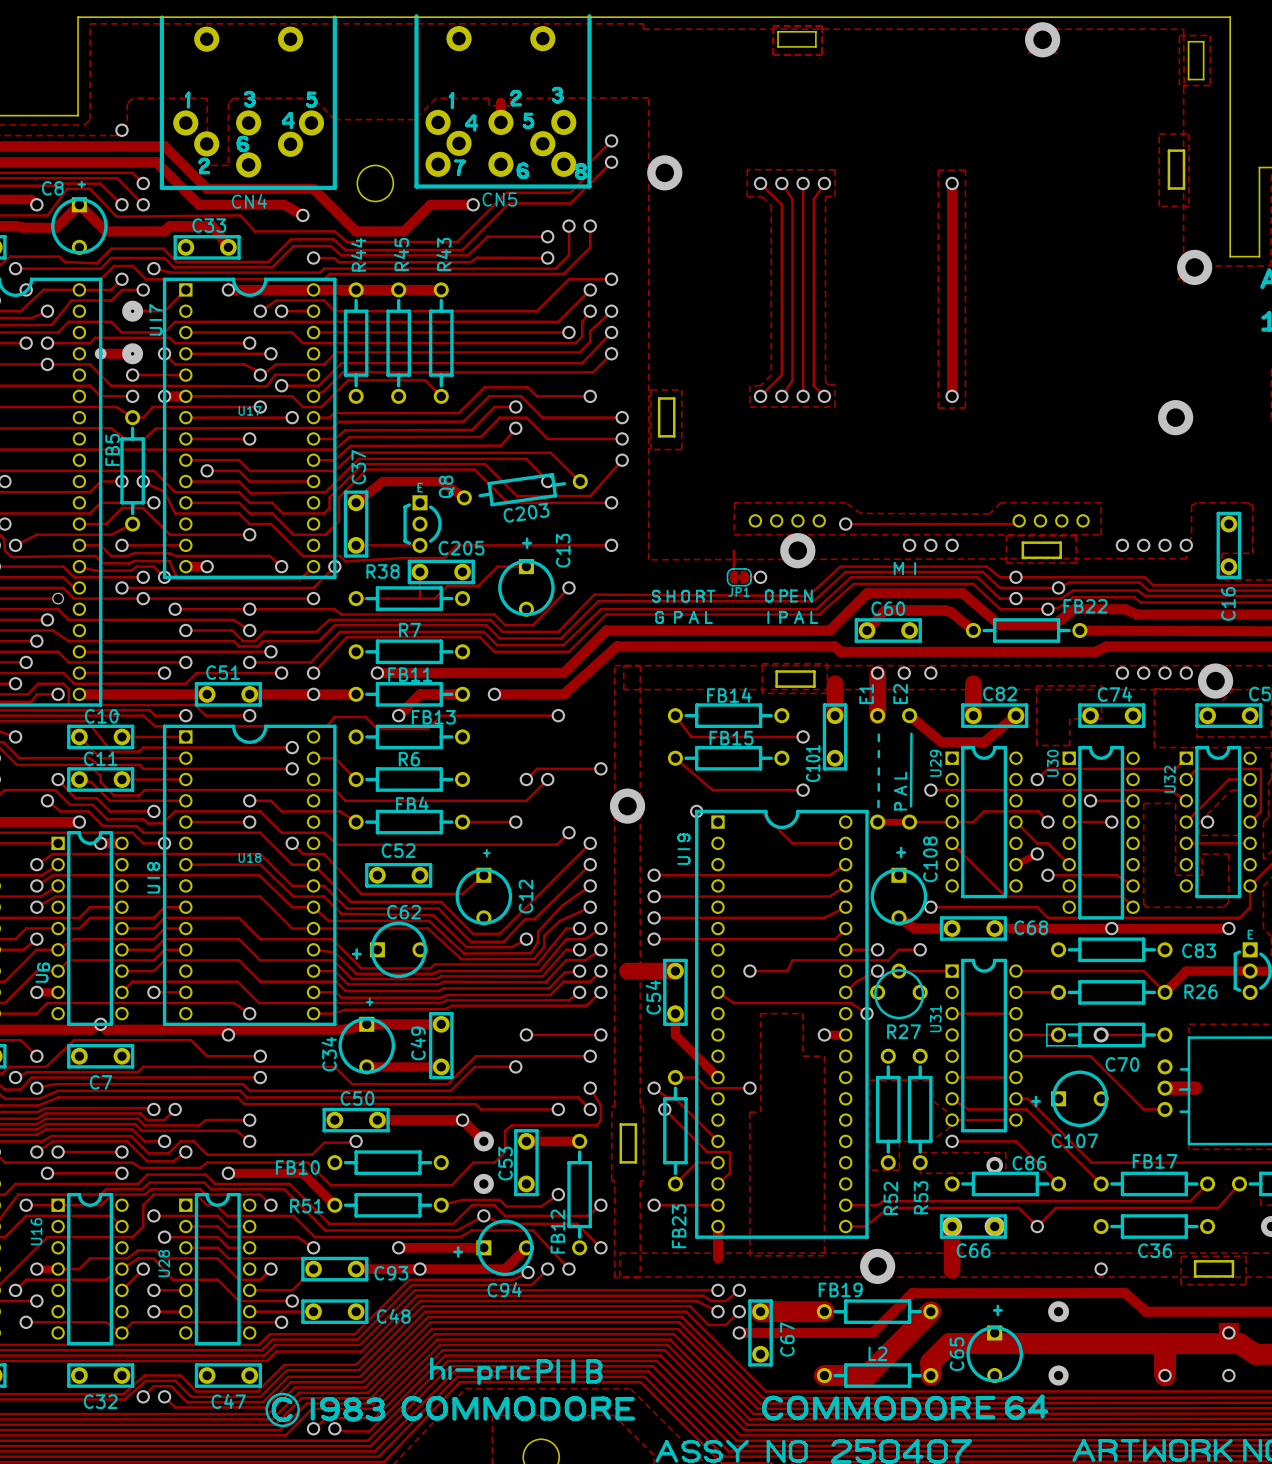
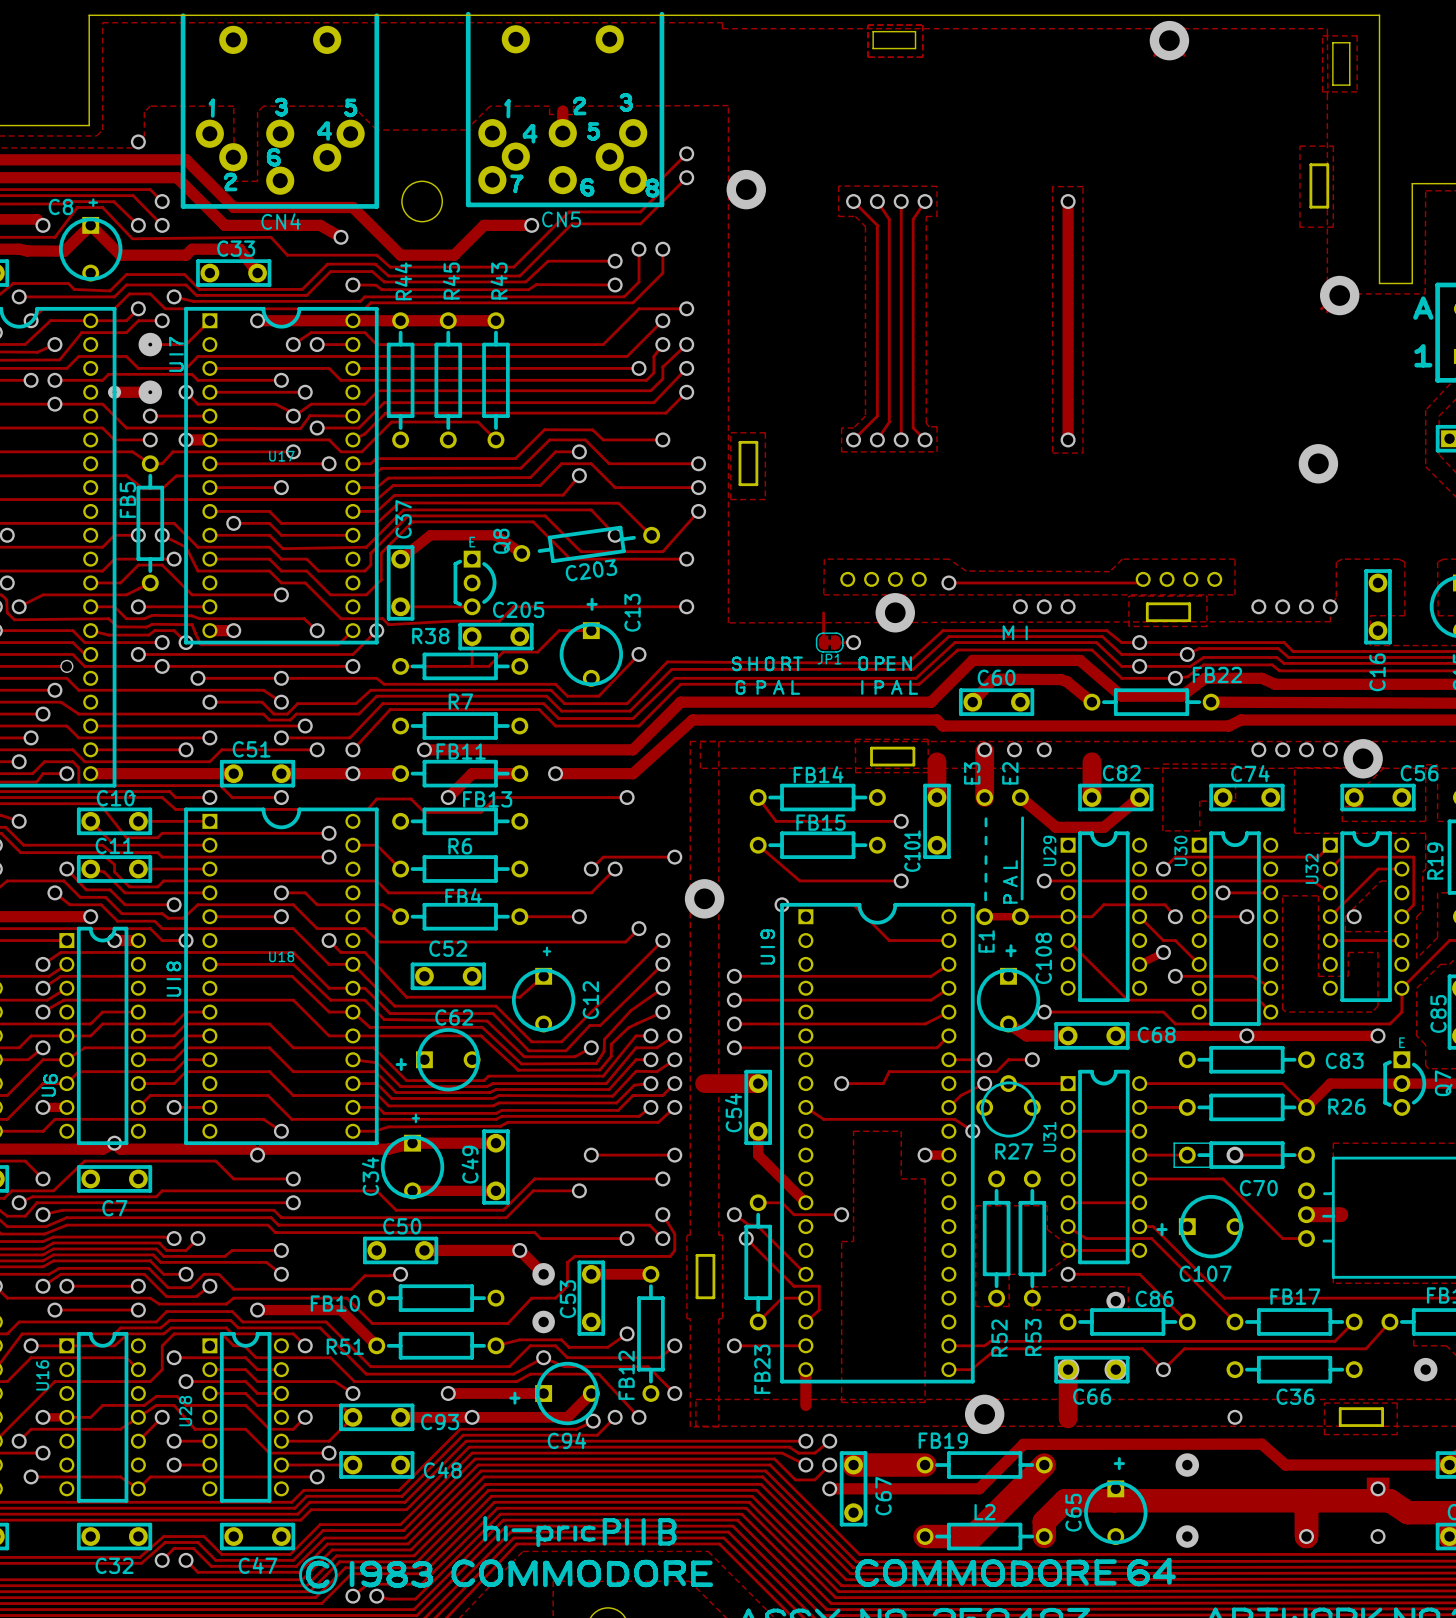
E1 name: E1 (866, 694) -> E3 (972, 773)
text: none -> E1 (986, 941)

